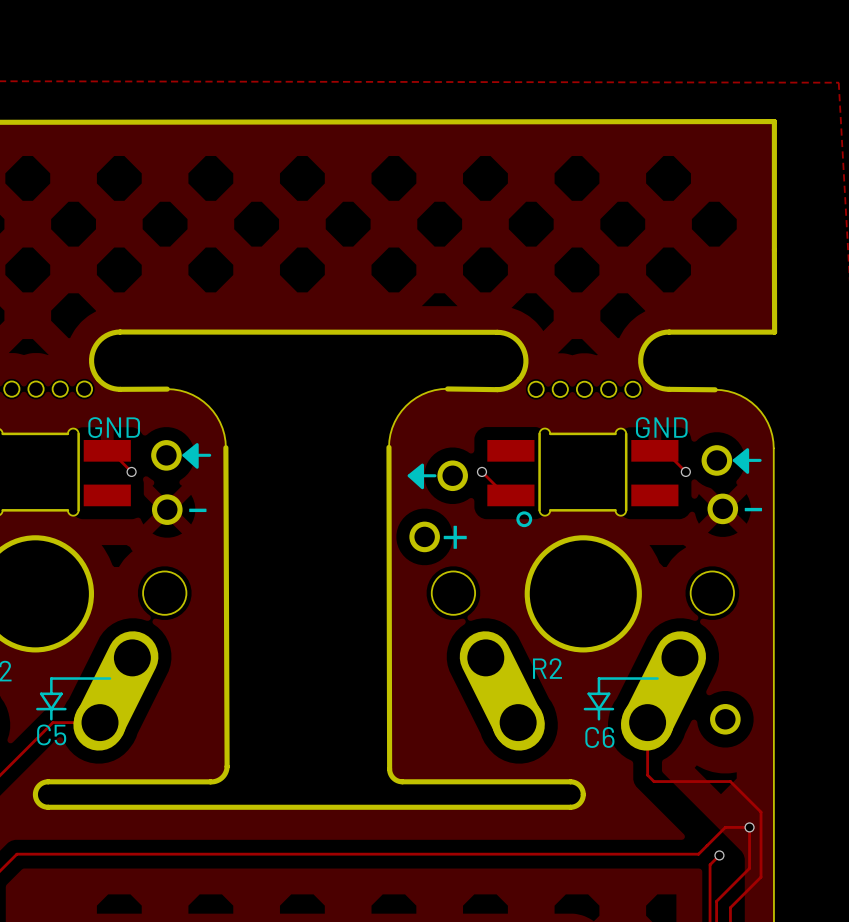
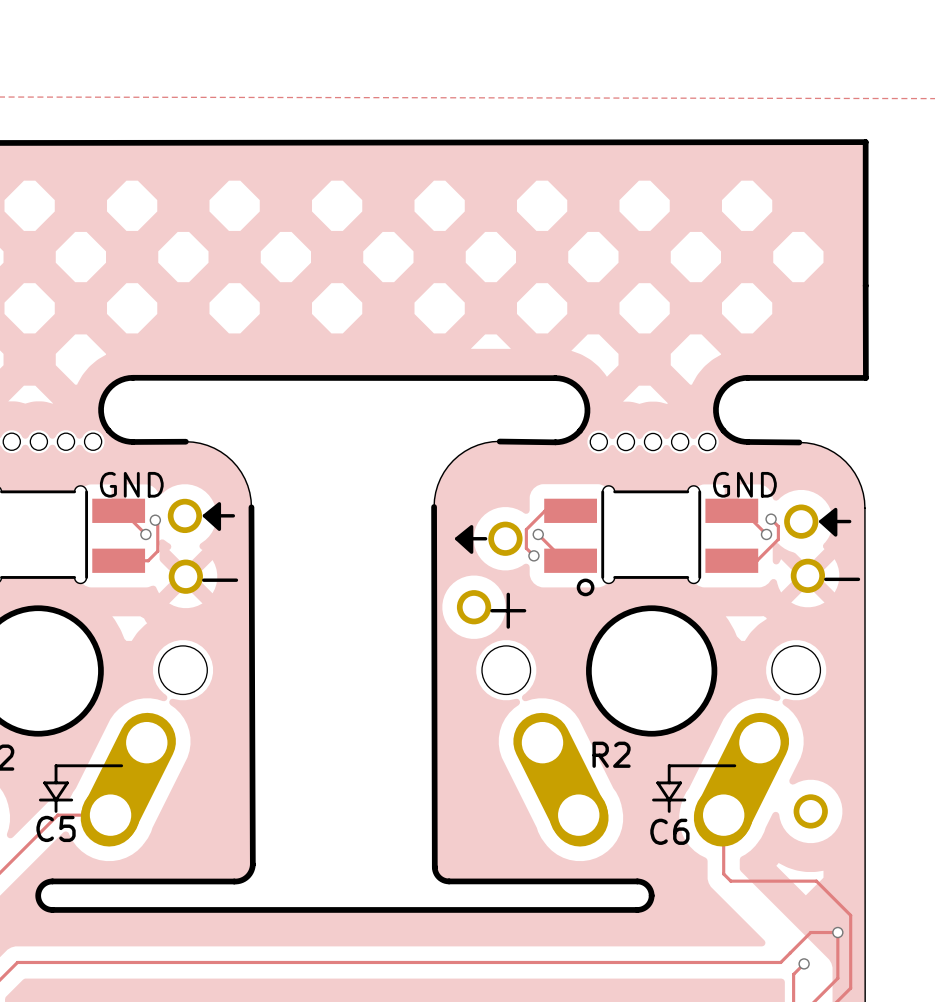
track: none -> (570, 510) (545, 510) (526, 529) (526, 548) (533, 555)
track: none -> (771, 519) (778, 526) (778, 539) (757, 560) (731, 560)
via: none -> (771, 519)
track: none -> (155, 520) (157, 522) (157, 551) (148, 560) (118, 560)
via: none -> (155, 520)
via: none -> (533, 555)

